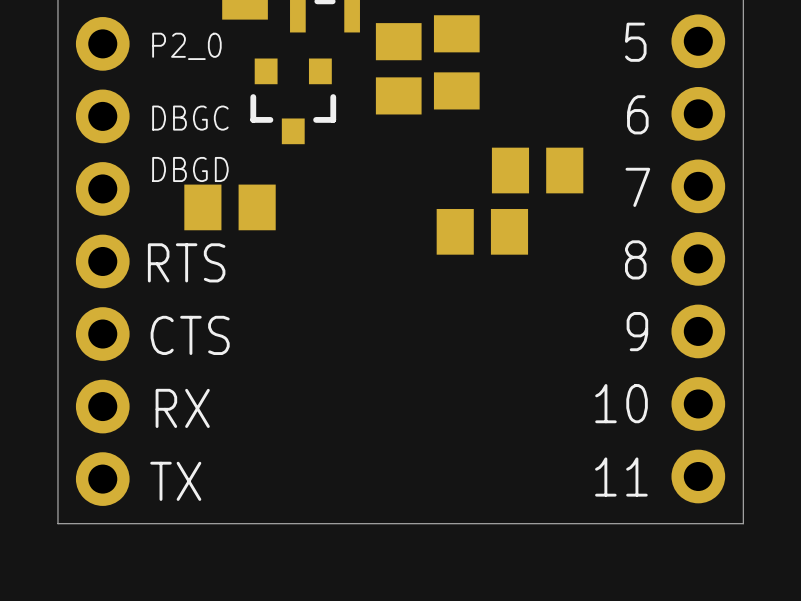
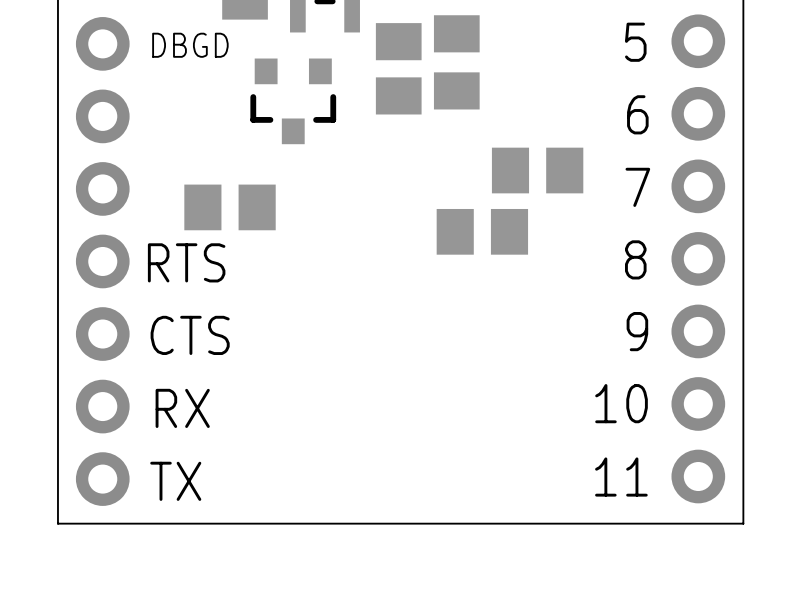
text: P2_0 (186, 46) -> DBGD (190, 45)
text: DBGC (190, 118) -> none
text: DBGD (190, 169) -> none

